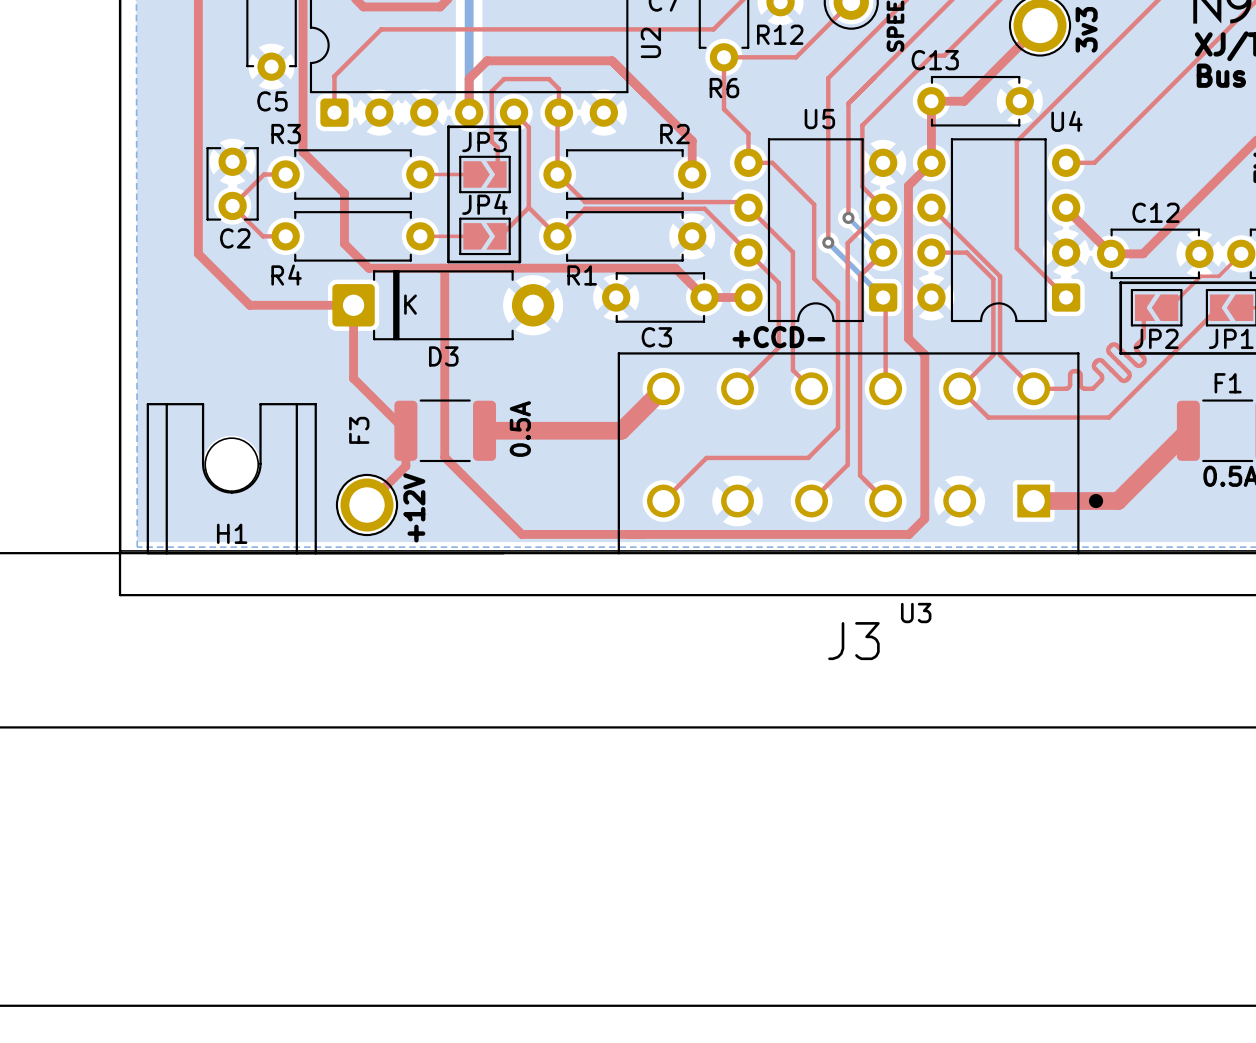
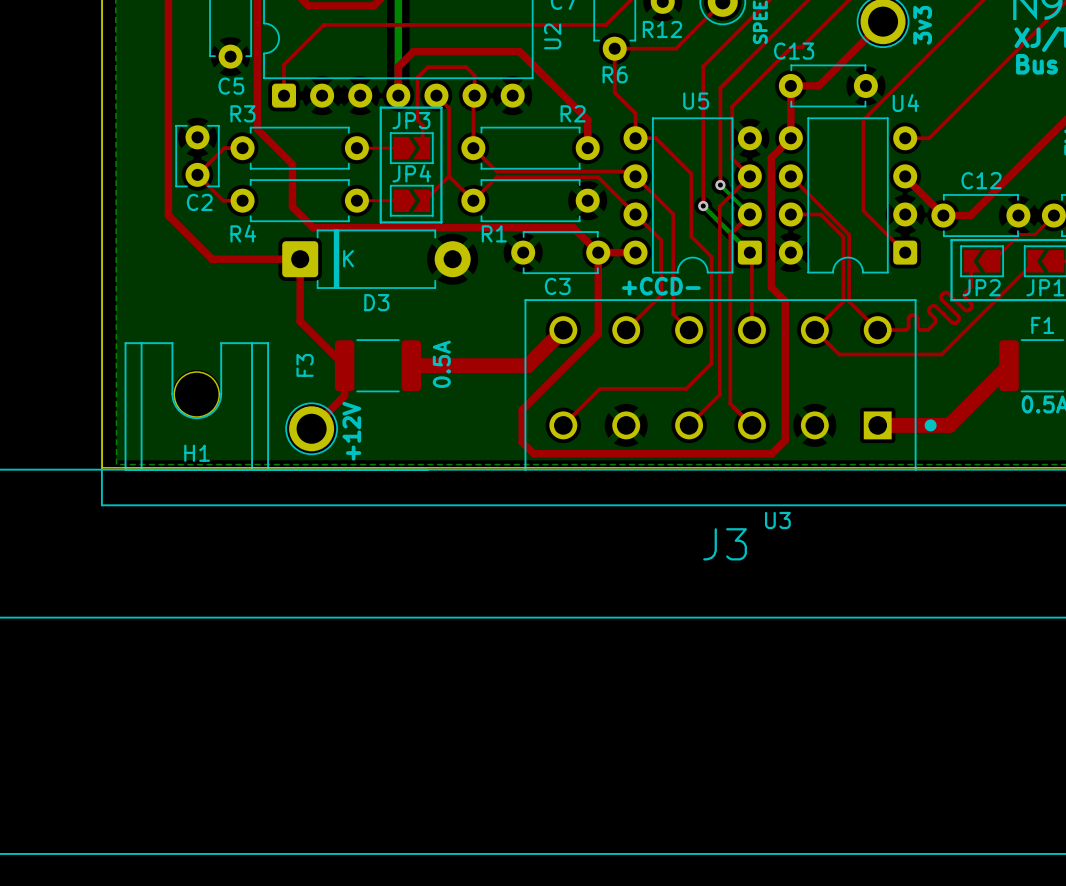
top track: (444, 268) (444, 457) (521, 534) (628, 534) -> (598, 252) (598, 333) (522, 409) (522, 442) (533, 453)

